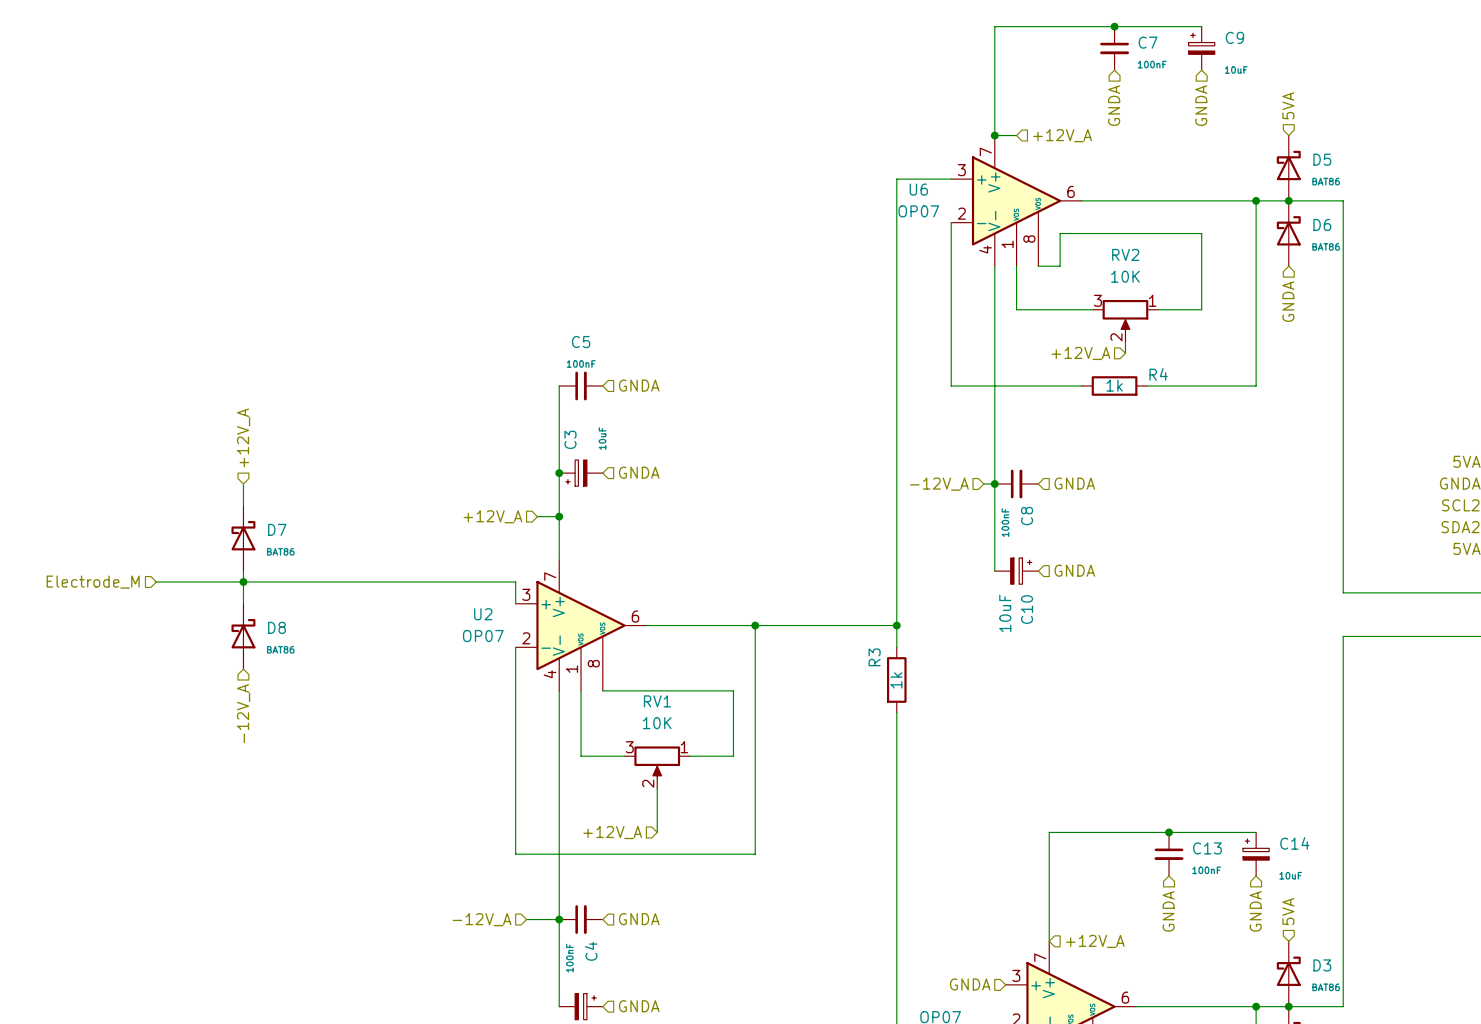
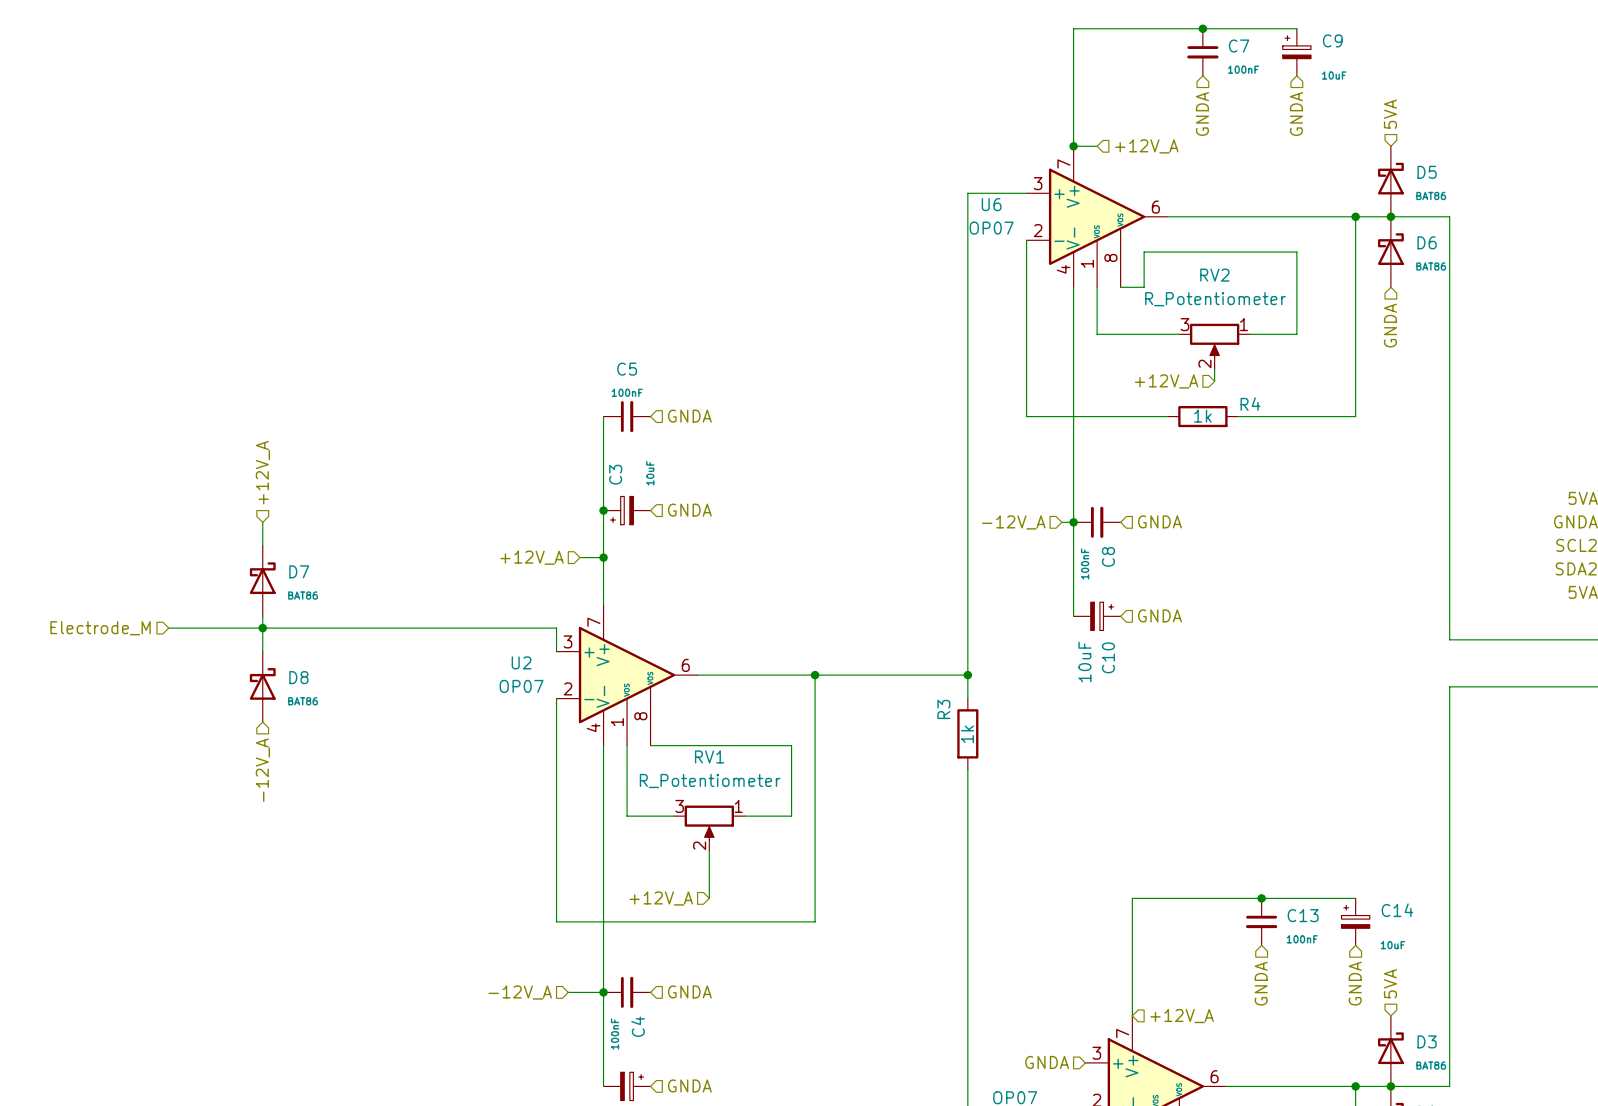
RV2 value: 10K (1125, 276) -> R_Potentiometer (1215, 299)
RV1 value: 10K (657, 723) -> R_Potentiometer (710, 781)

